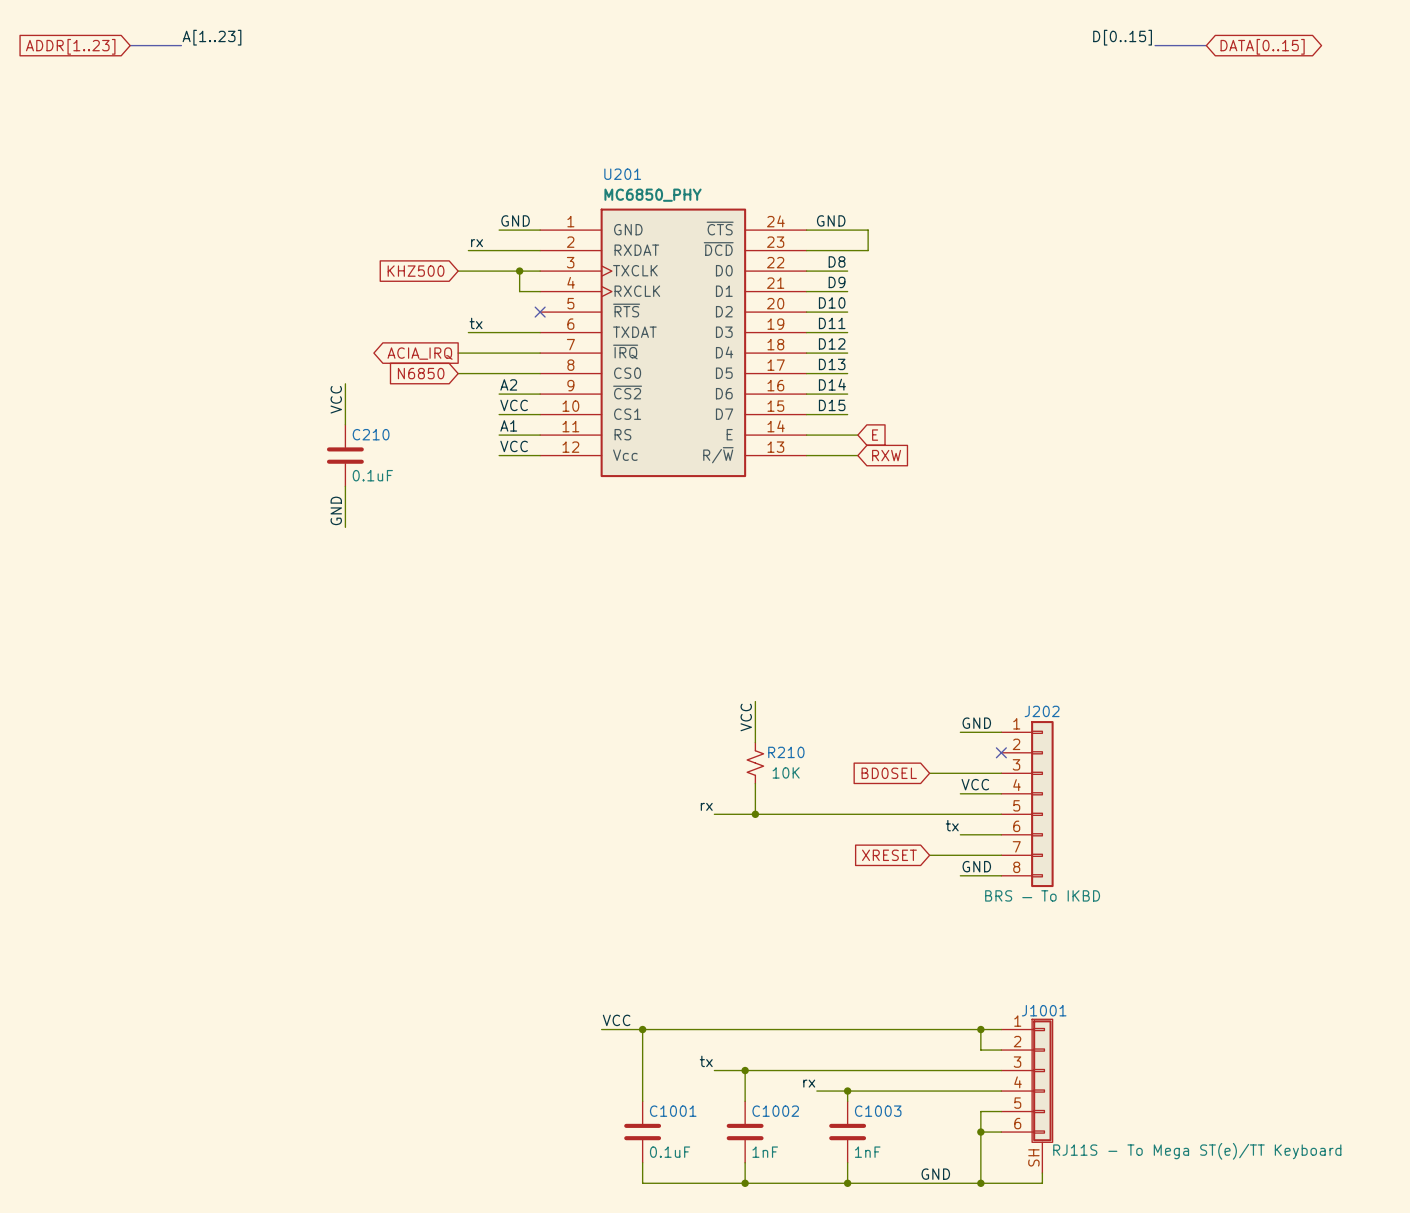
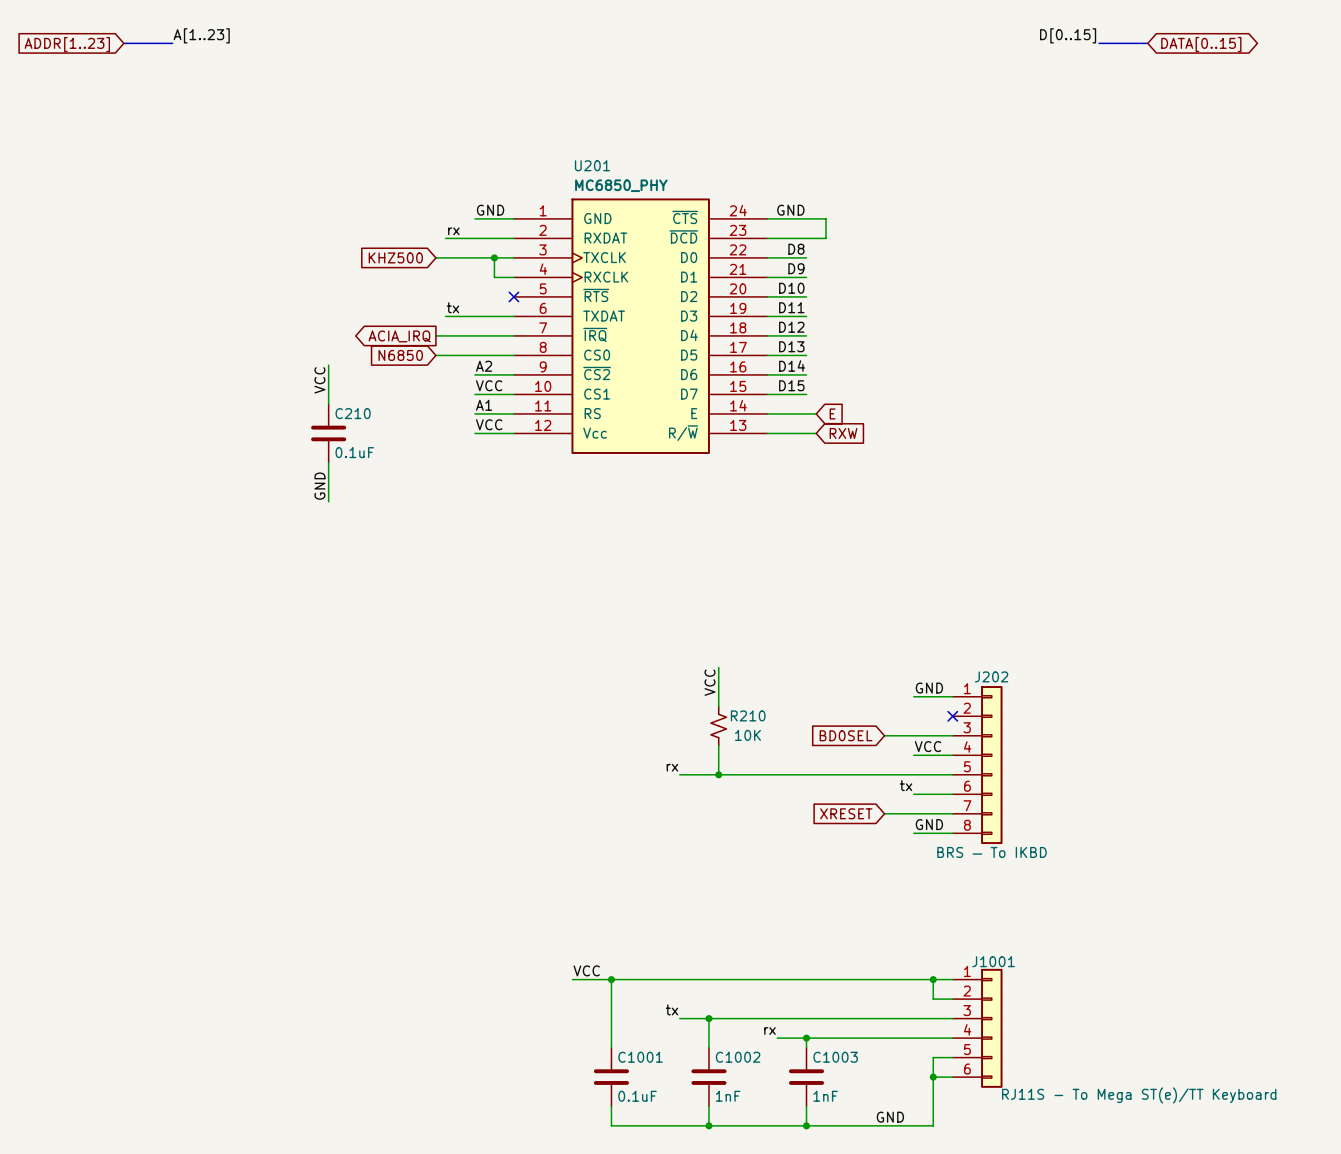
J1001 symbol: [1001, 1018, 1054, 1174] -> [952, 968, 1003, 1088]
wire: (1042, 1173) (1042, 1183) (980, 1183) -> none
junction: (980, 1183) -> none

